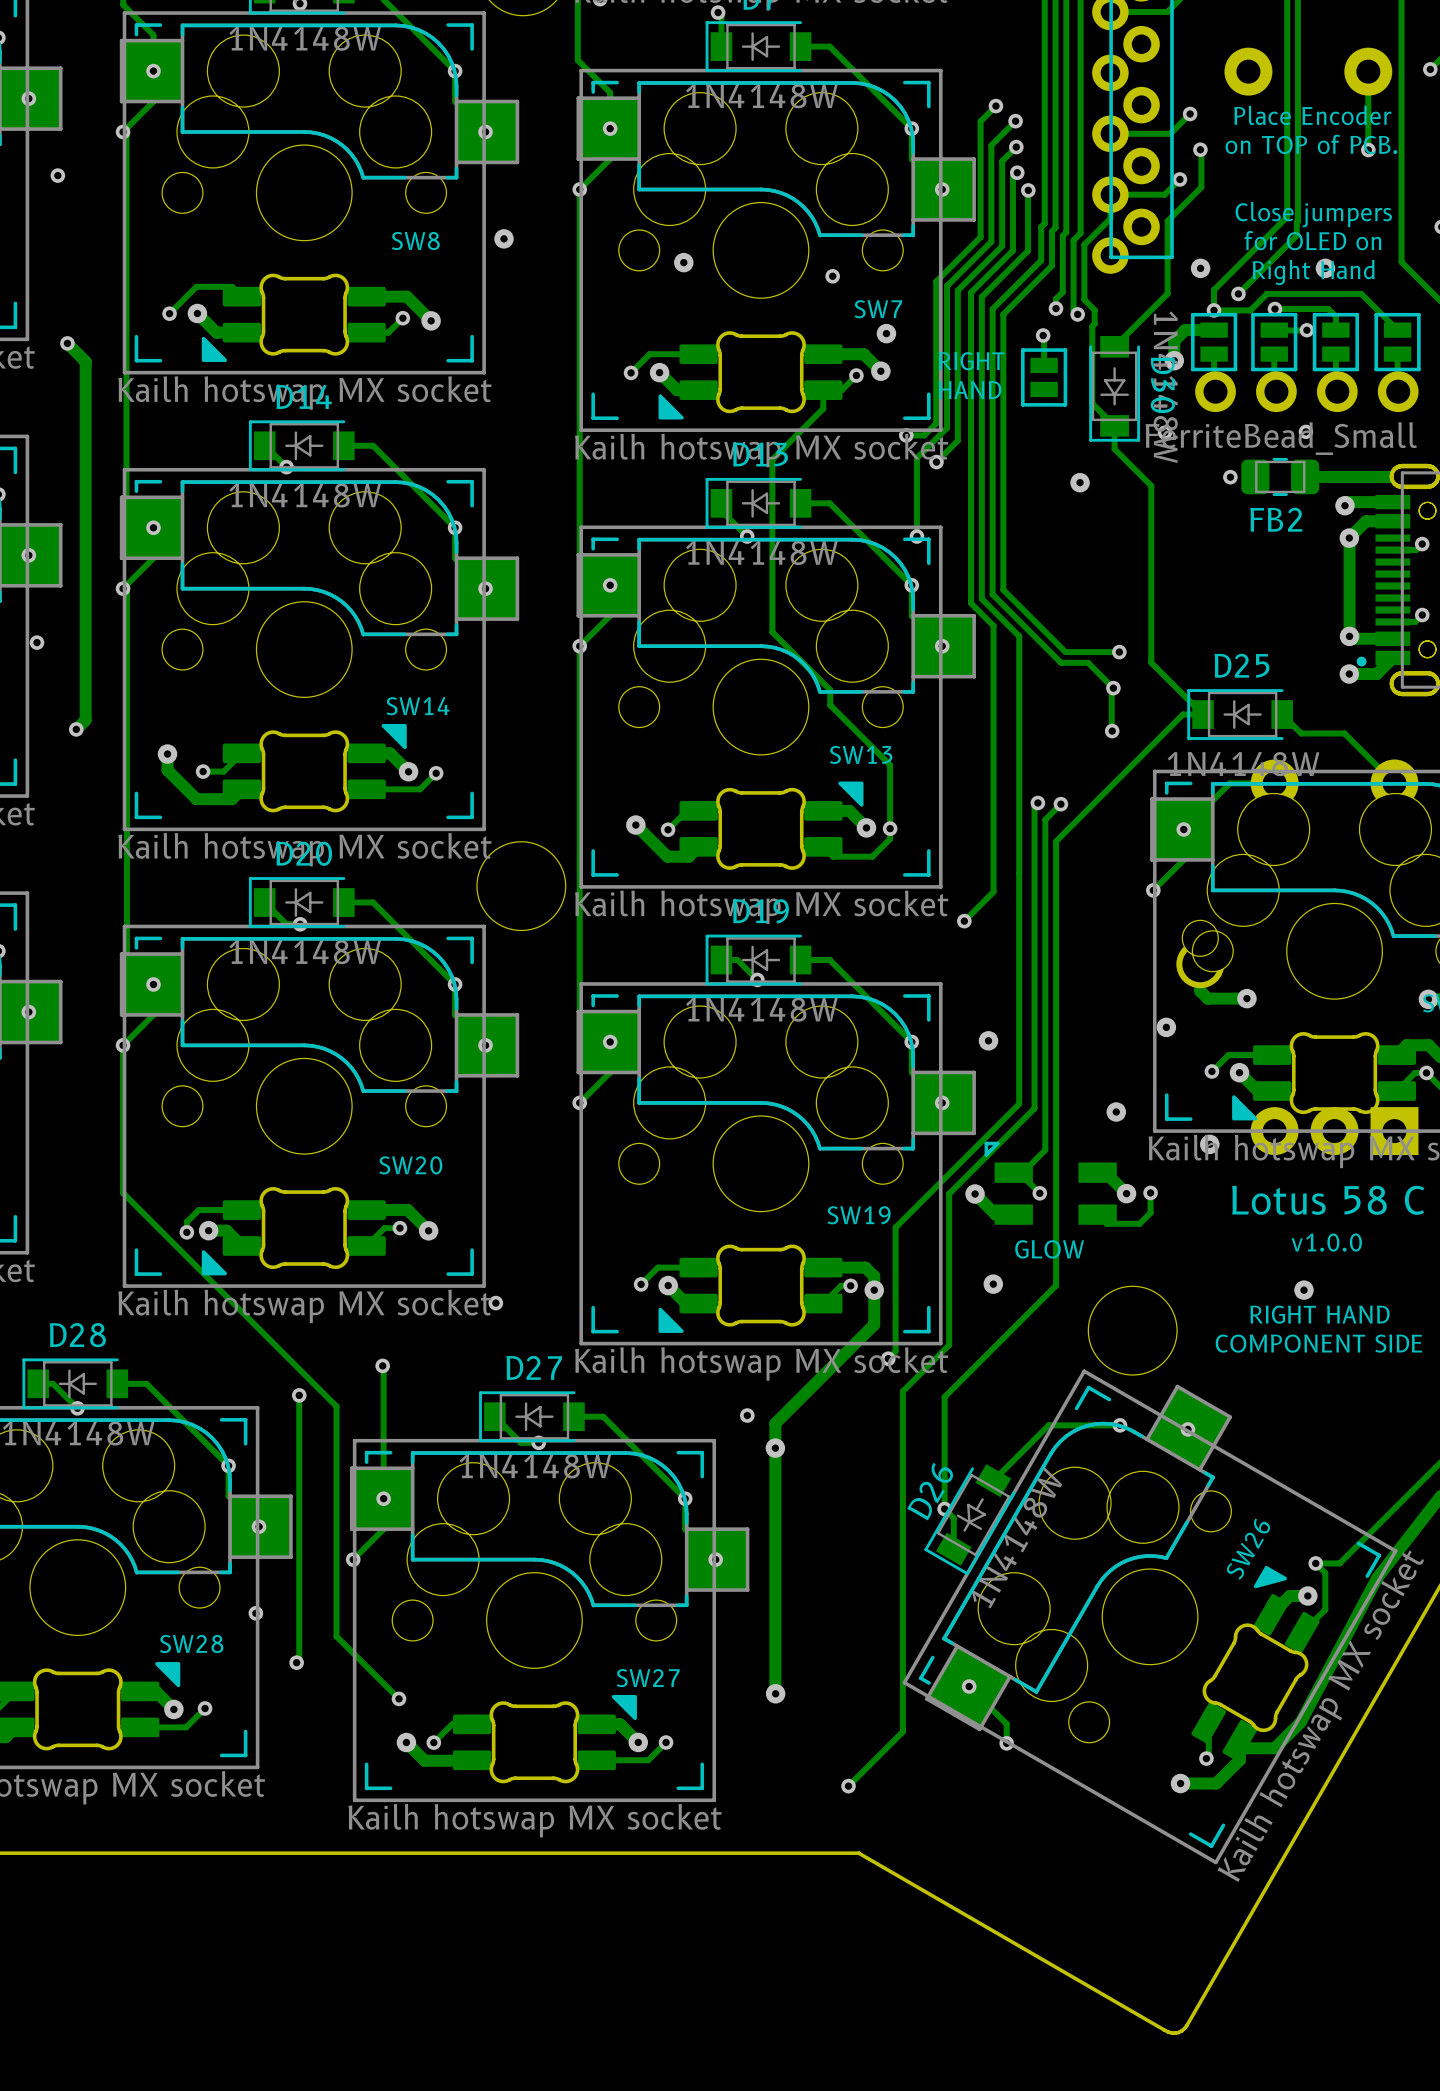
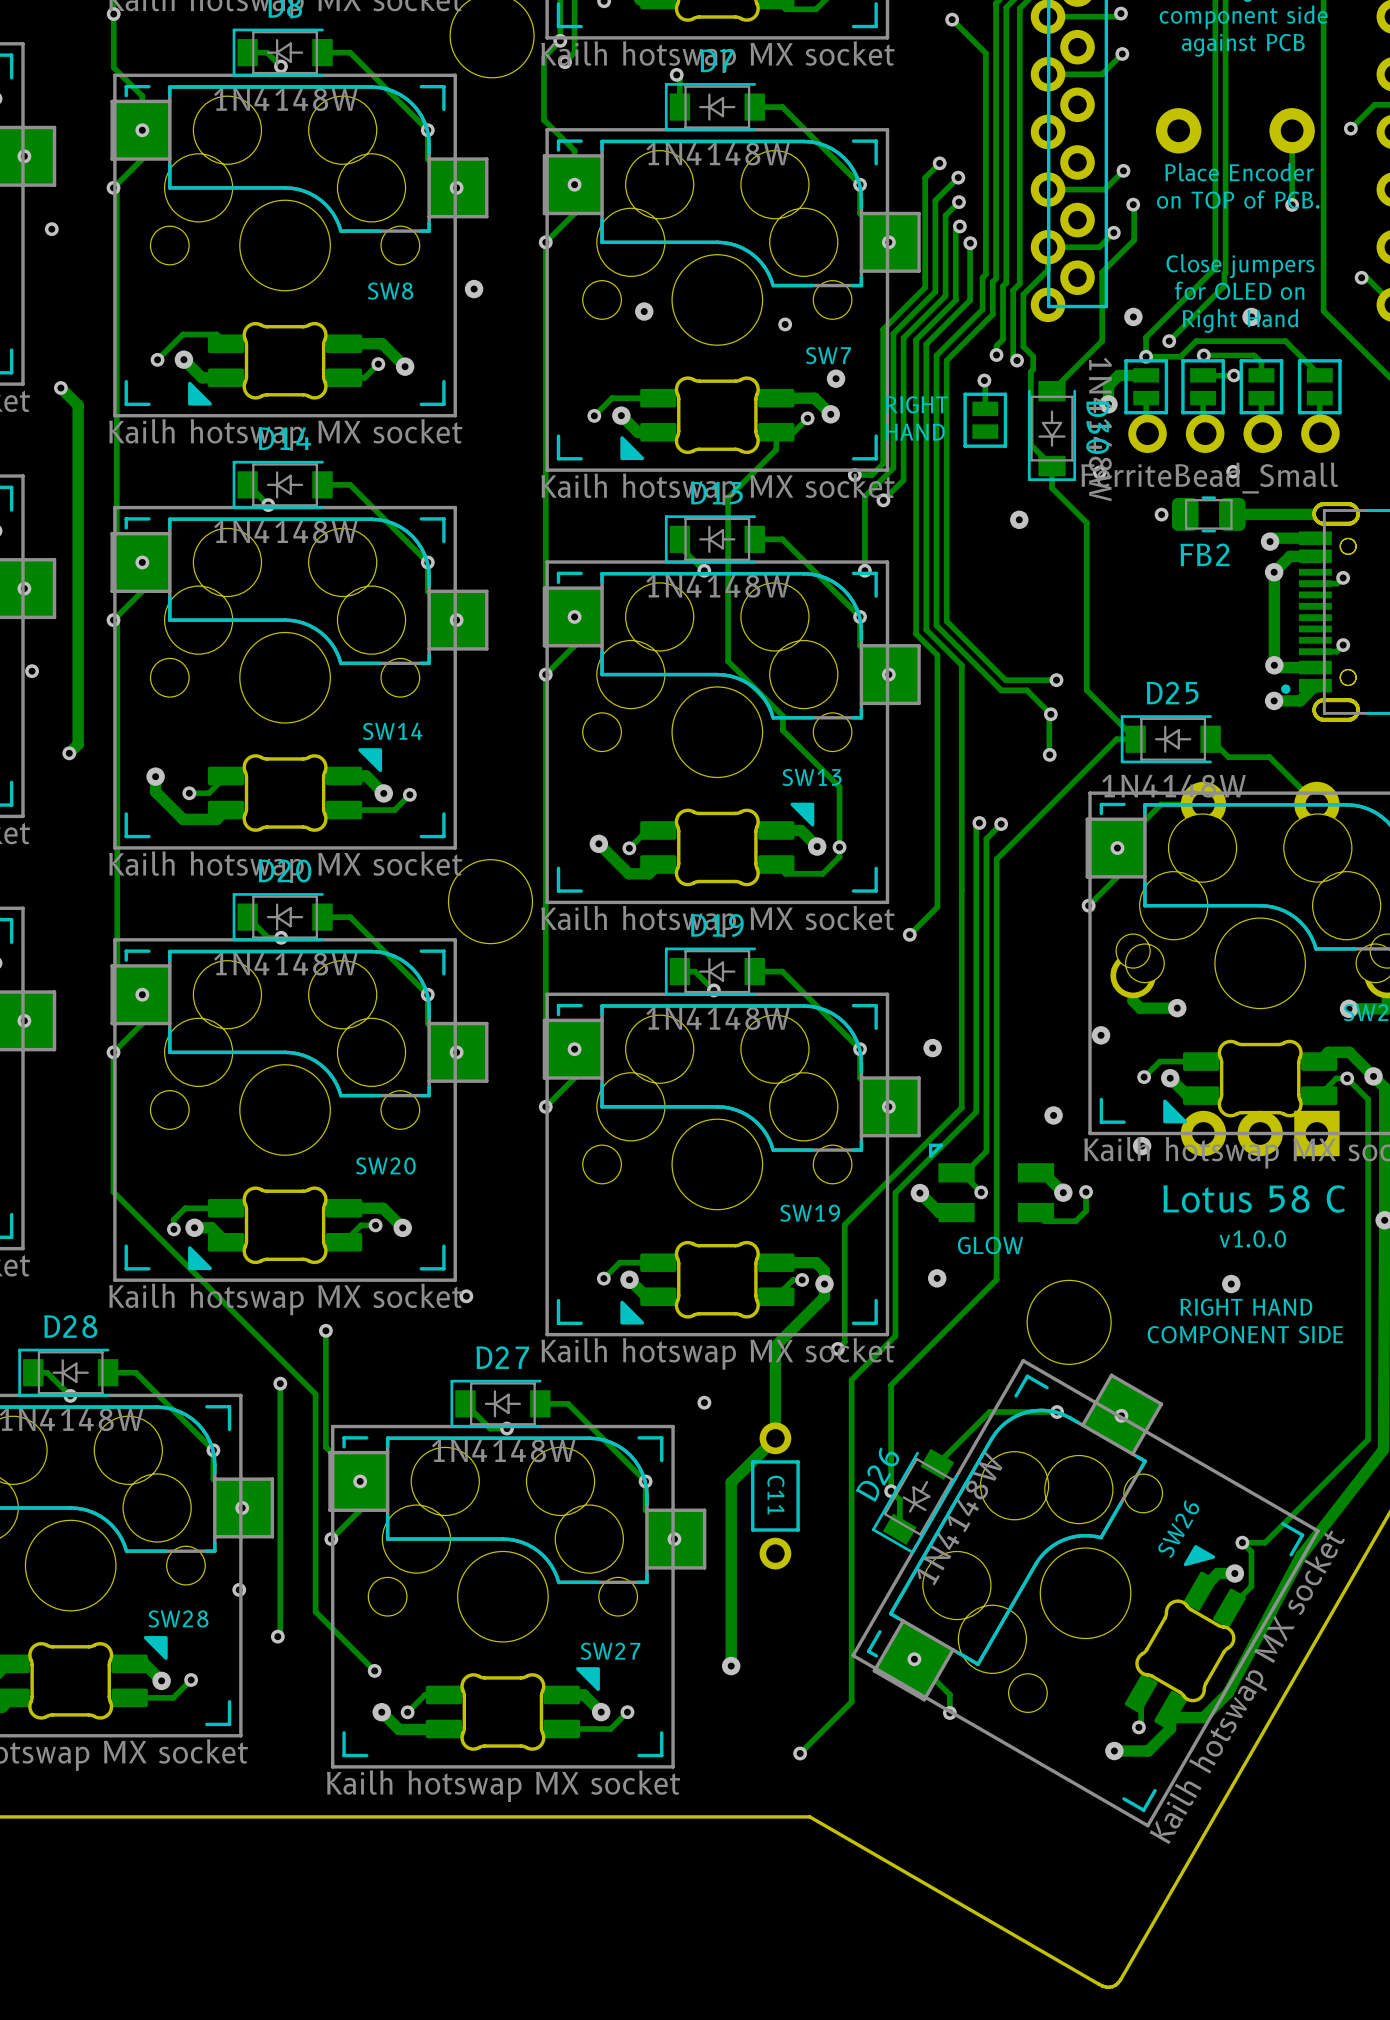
track: (874, 1303) (874, 1324) (775, 1423) (775, 1693) -> (824, 1297) (775, 1346) (775, 1438) (731, 1482) (731, 1666)
track: (382, 1365) (383, 1498) -> (325, 1330) (325, 1447) (360, 1481)
via position: (382, 1365) -> (325, 1330)
via: (775, 1448) -> none
C11: none -> (775, 1495)

